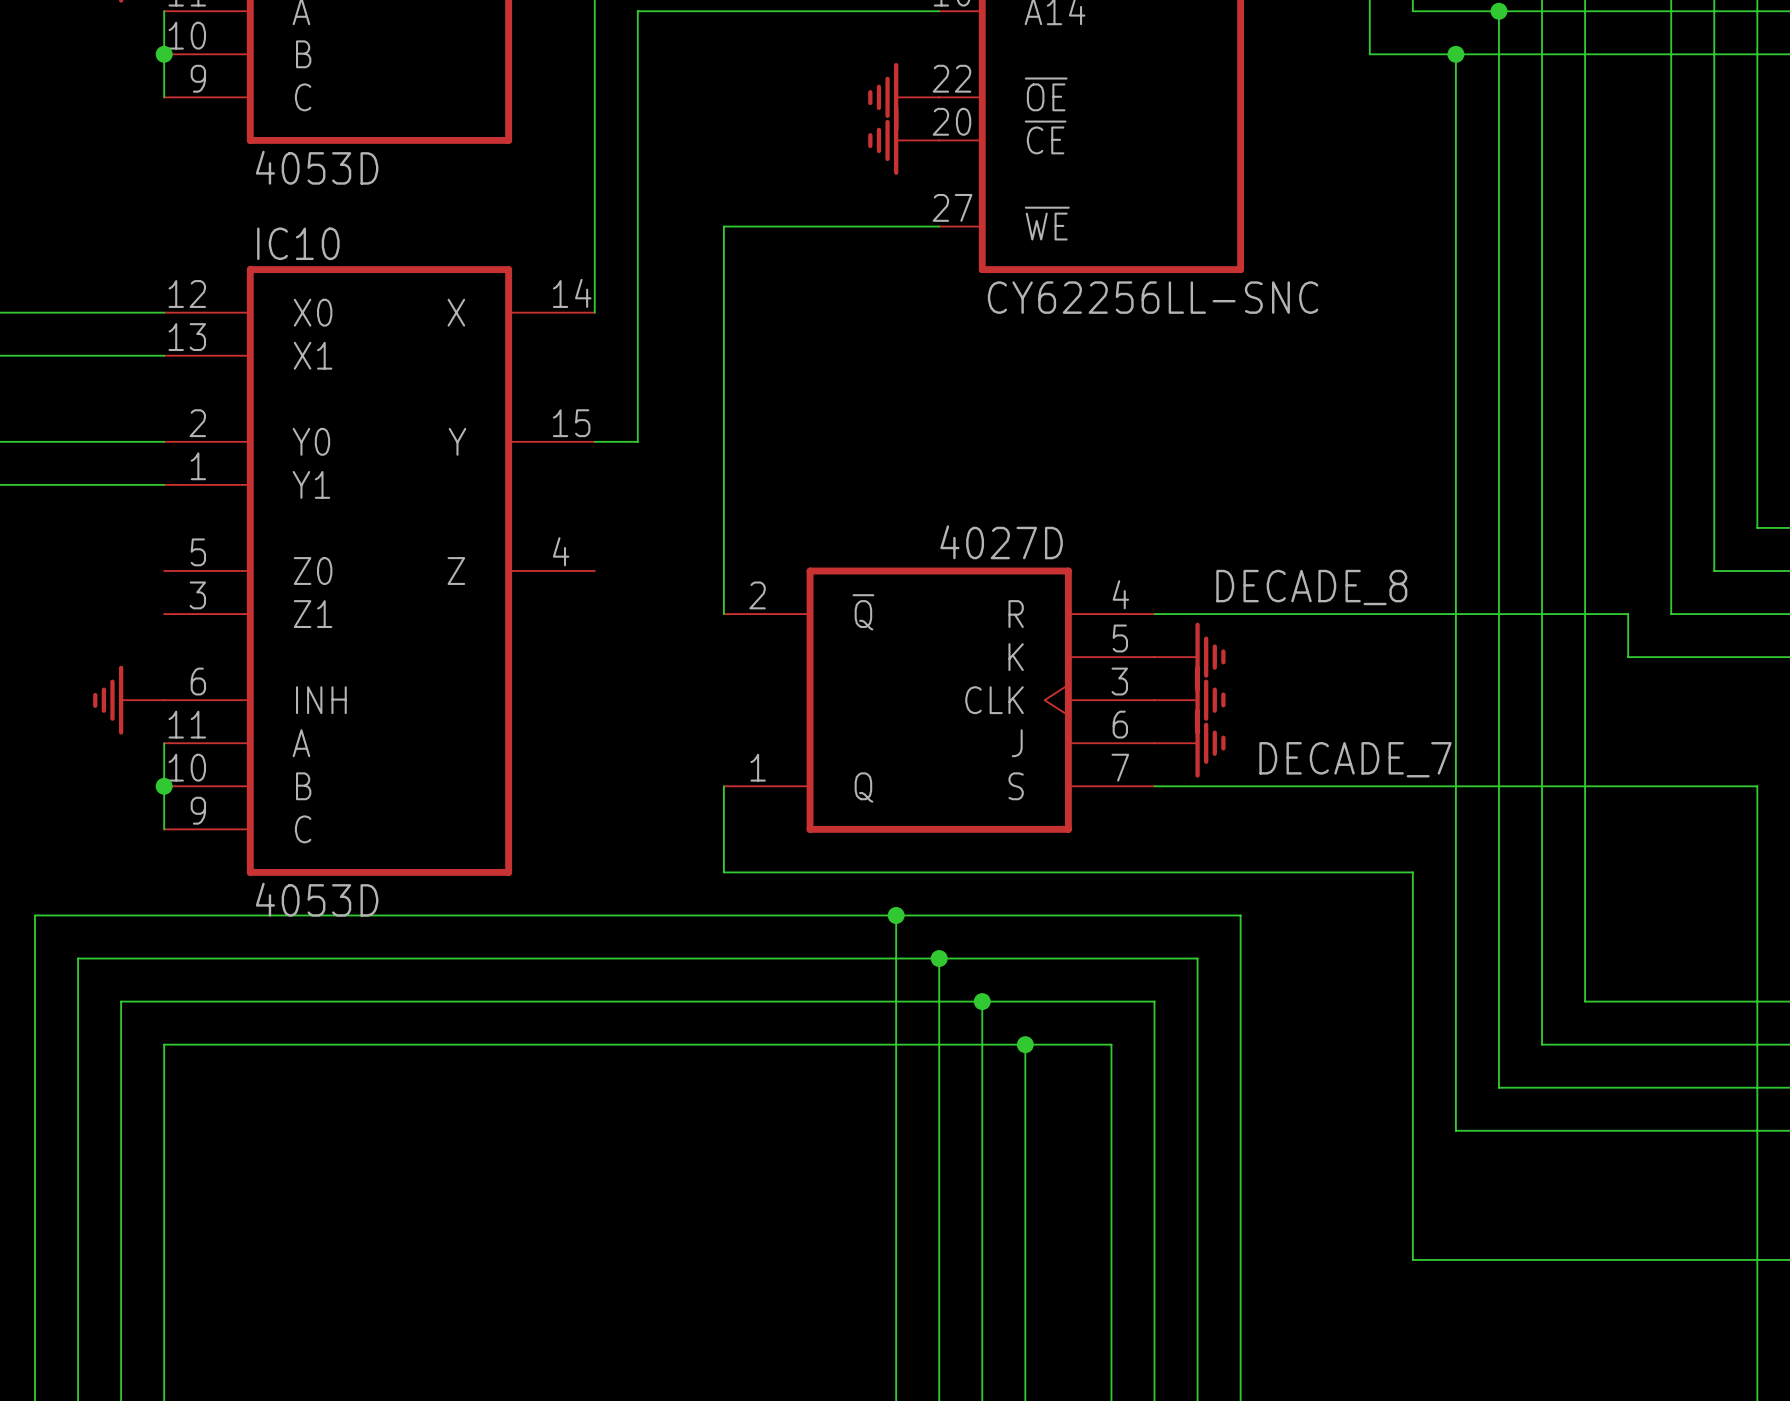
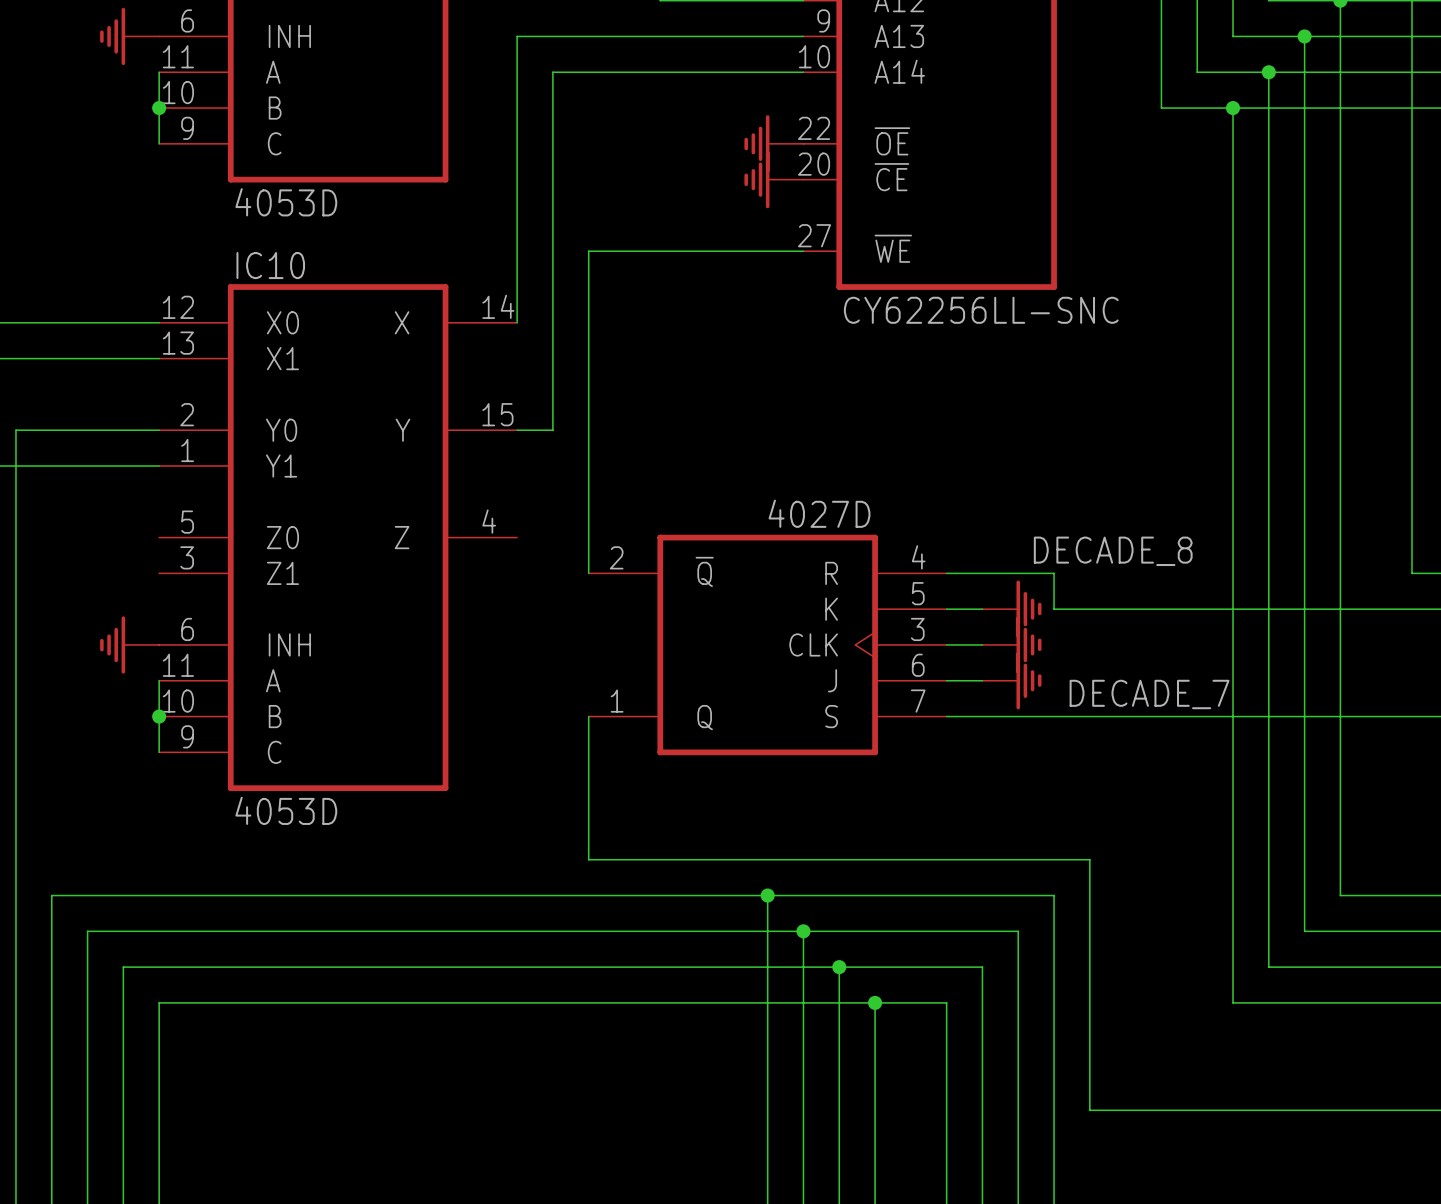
wire: (723, 226) (723, 614) -> (624, 251) (588, 251) (588, 573)
wire: (1240, 614) (1628, 614) (1628, 657) -> (1054, 573) (1054, 609) (1376, 609)
part position: (939, 700) -> (767, 644)
wire: (723, 786) (723, 872) (1412, 872) (1412, 1259) -> (1018, 859) (1089, 859) (1089, 1110) (1197, 1110)
wire: (896, 915) (896, 1001) -> none
junction: (896, 915) -> none
wire: (680, 958) (78, 958) (78, 1044) -> (588, 859) (588, 716)
wire: (939, 958) (939, 1044) -> none
junction: (939, 958) -> none
wire: (1197, 958) (1197, 1044) -> (946, 931) (1018, 931)
wire: (34, 1001) (34, 915) (1240, 915) (1240, 1001) -> none
wire: (121, 1001) (121, 1087) -> (123, 895) (51, 895)
junction: none -> (767, 895)
wire: (982, 1001) (982, 1087) -> none
junction: (982, 1001) -> none
wire: (1154, 1001) (1154, 1087) -> (982, 895) (1054, 895)
wire: (164, 1044) (164, 1130) -> (159, 931) (87, 931)
junction: none -> (803, 931)
wire: (1025, 1044) (1025, 1130) -> none
junction: (1025, 1044) -> none
wire: (1111, 1044) (1111, 1130) -> (159, 1002) (946, 1002)
wire: none -> (123, 967) (982, 967)
junction: none -> (839, 967)
junction: none -> (875, 1002)

